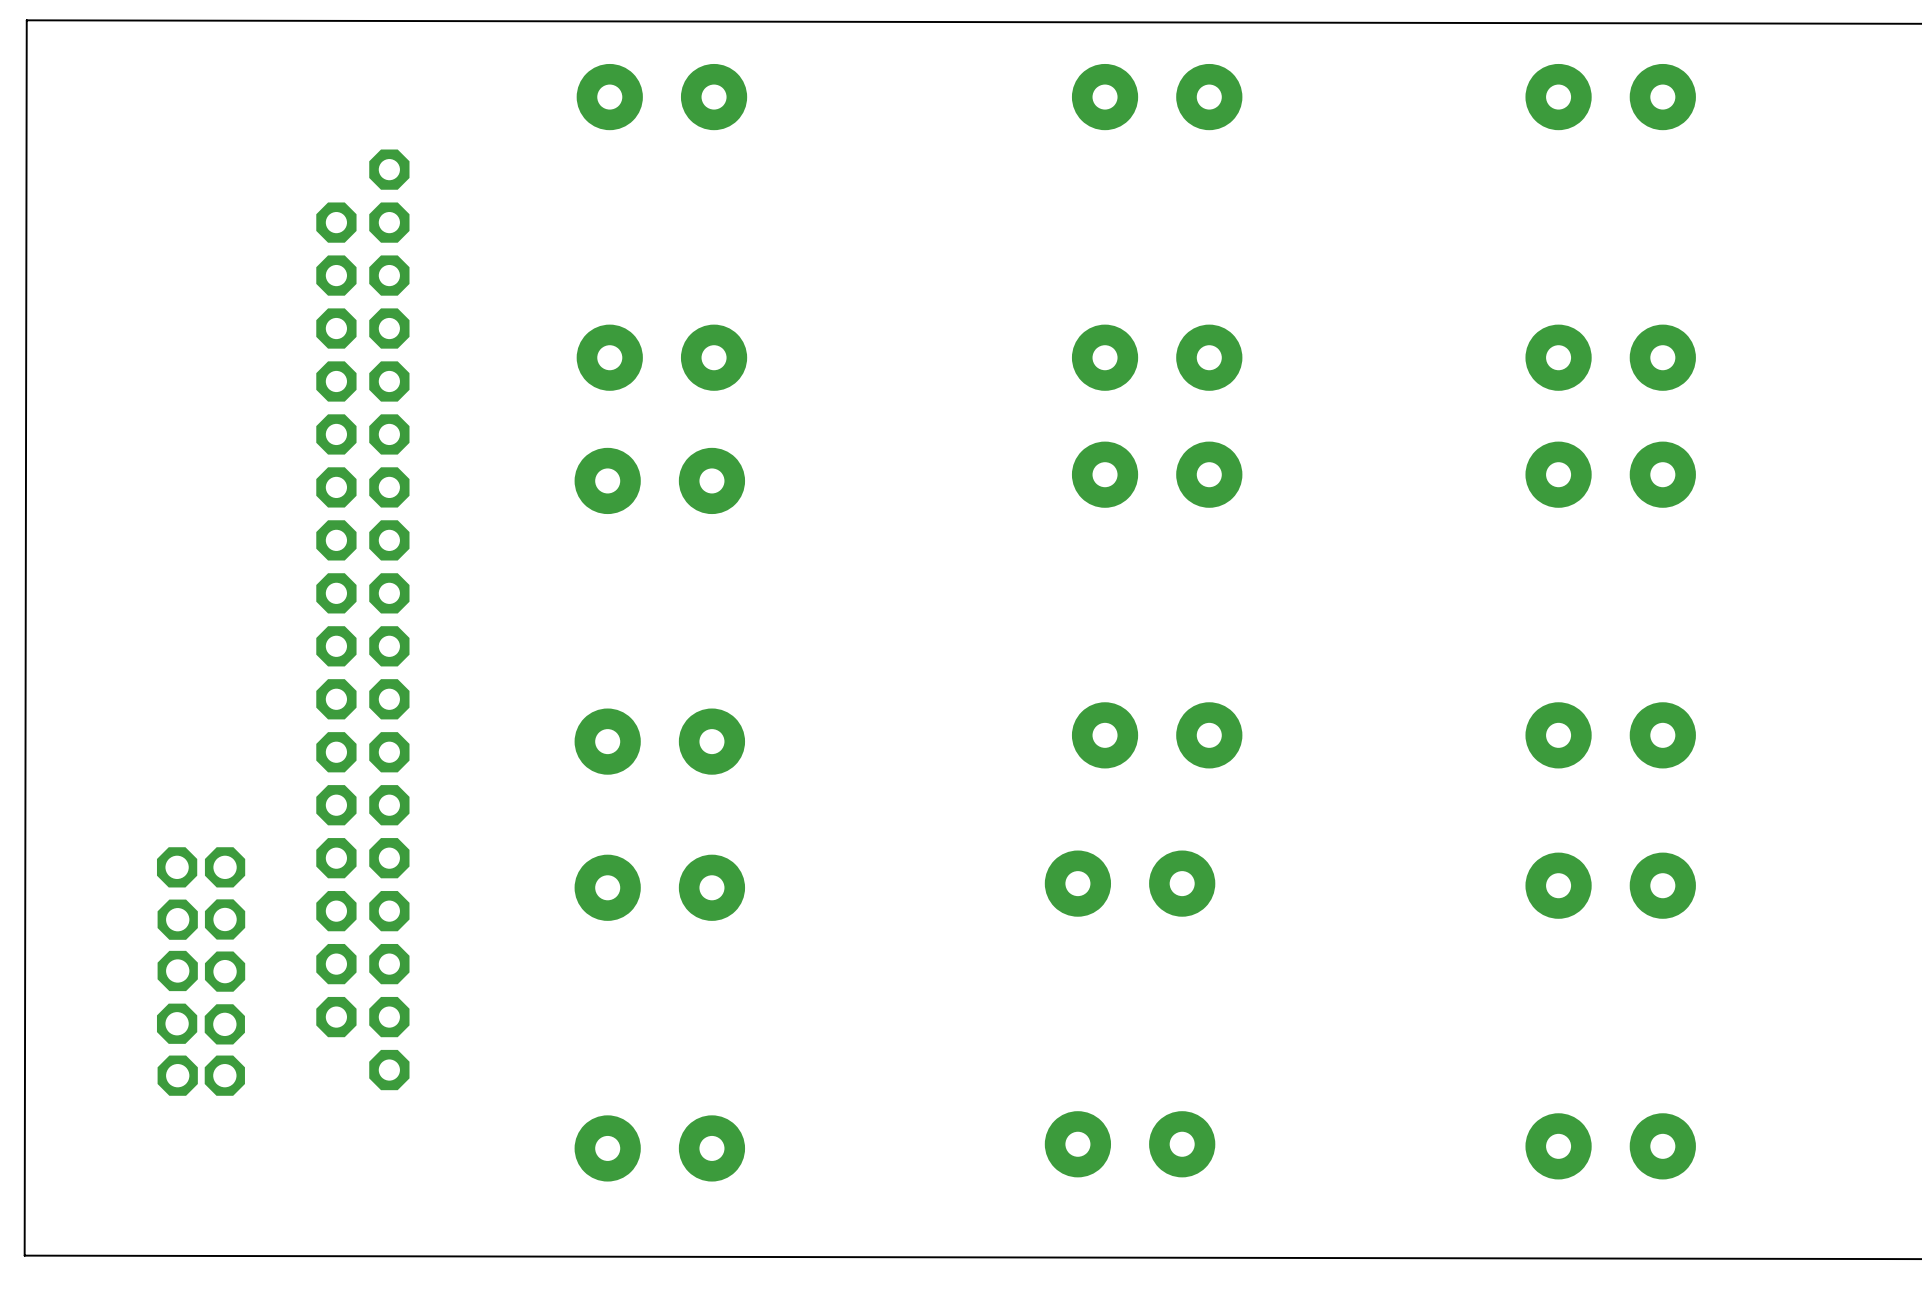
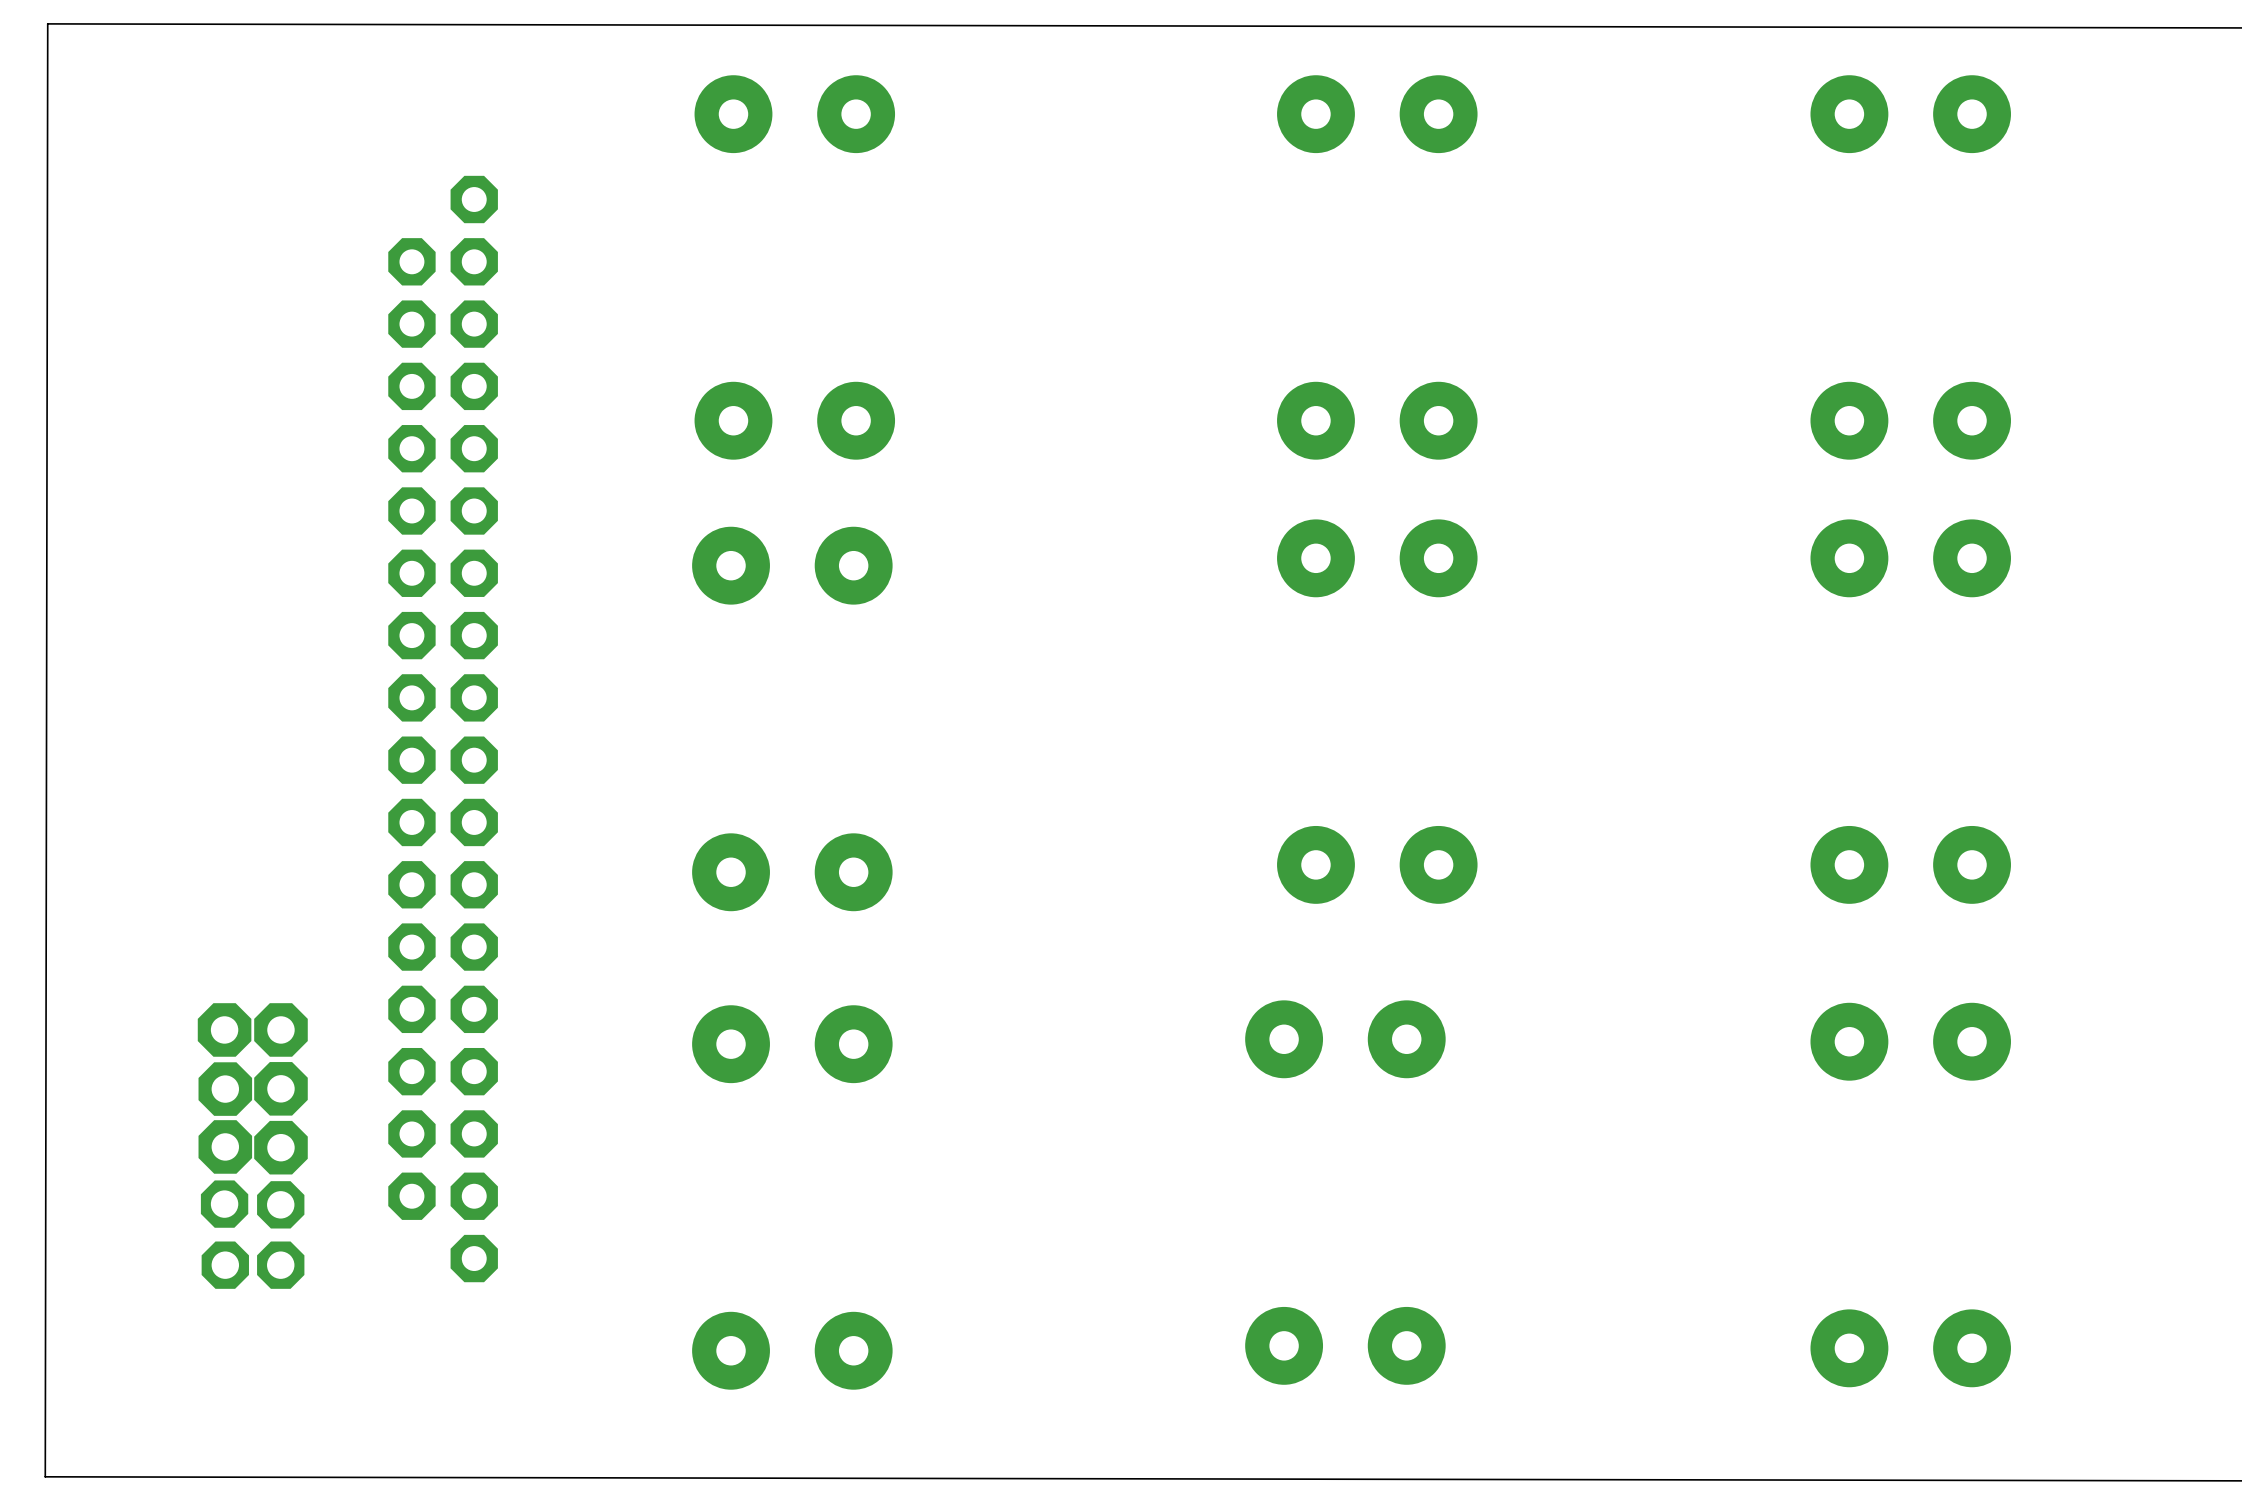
part footprint: [156, 847, 198, 888] -> [197, 1003, 252, 1057]
part footprint: [204, 847, 246, 888] -> [254, 1003, 308, 1057]
part footprint: [157, 899, 198, 940] -> [198, 1062, 253, 1116]
part footprint: [204, 899, 246, 940] -> [254, 1062, 308, 1116]
part footprint: [157, 950, 198, 992] -> [198, 1120, 253, 1174]
part footprint: [204, 951, 246, 992] -> [254, 1120, 308, 1175]

